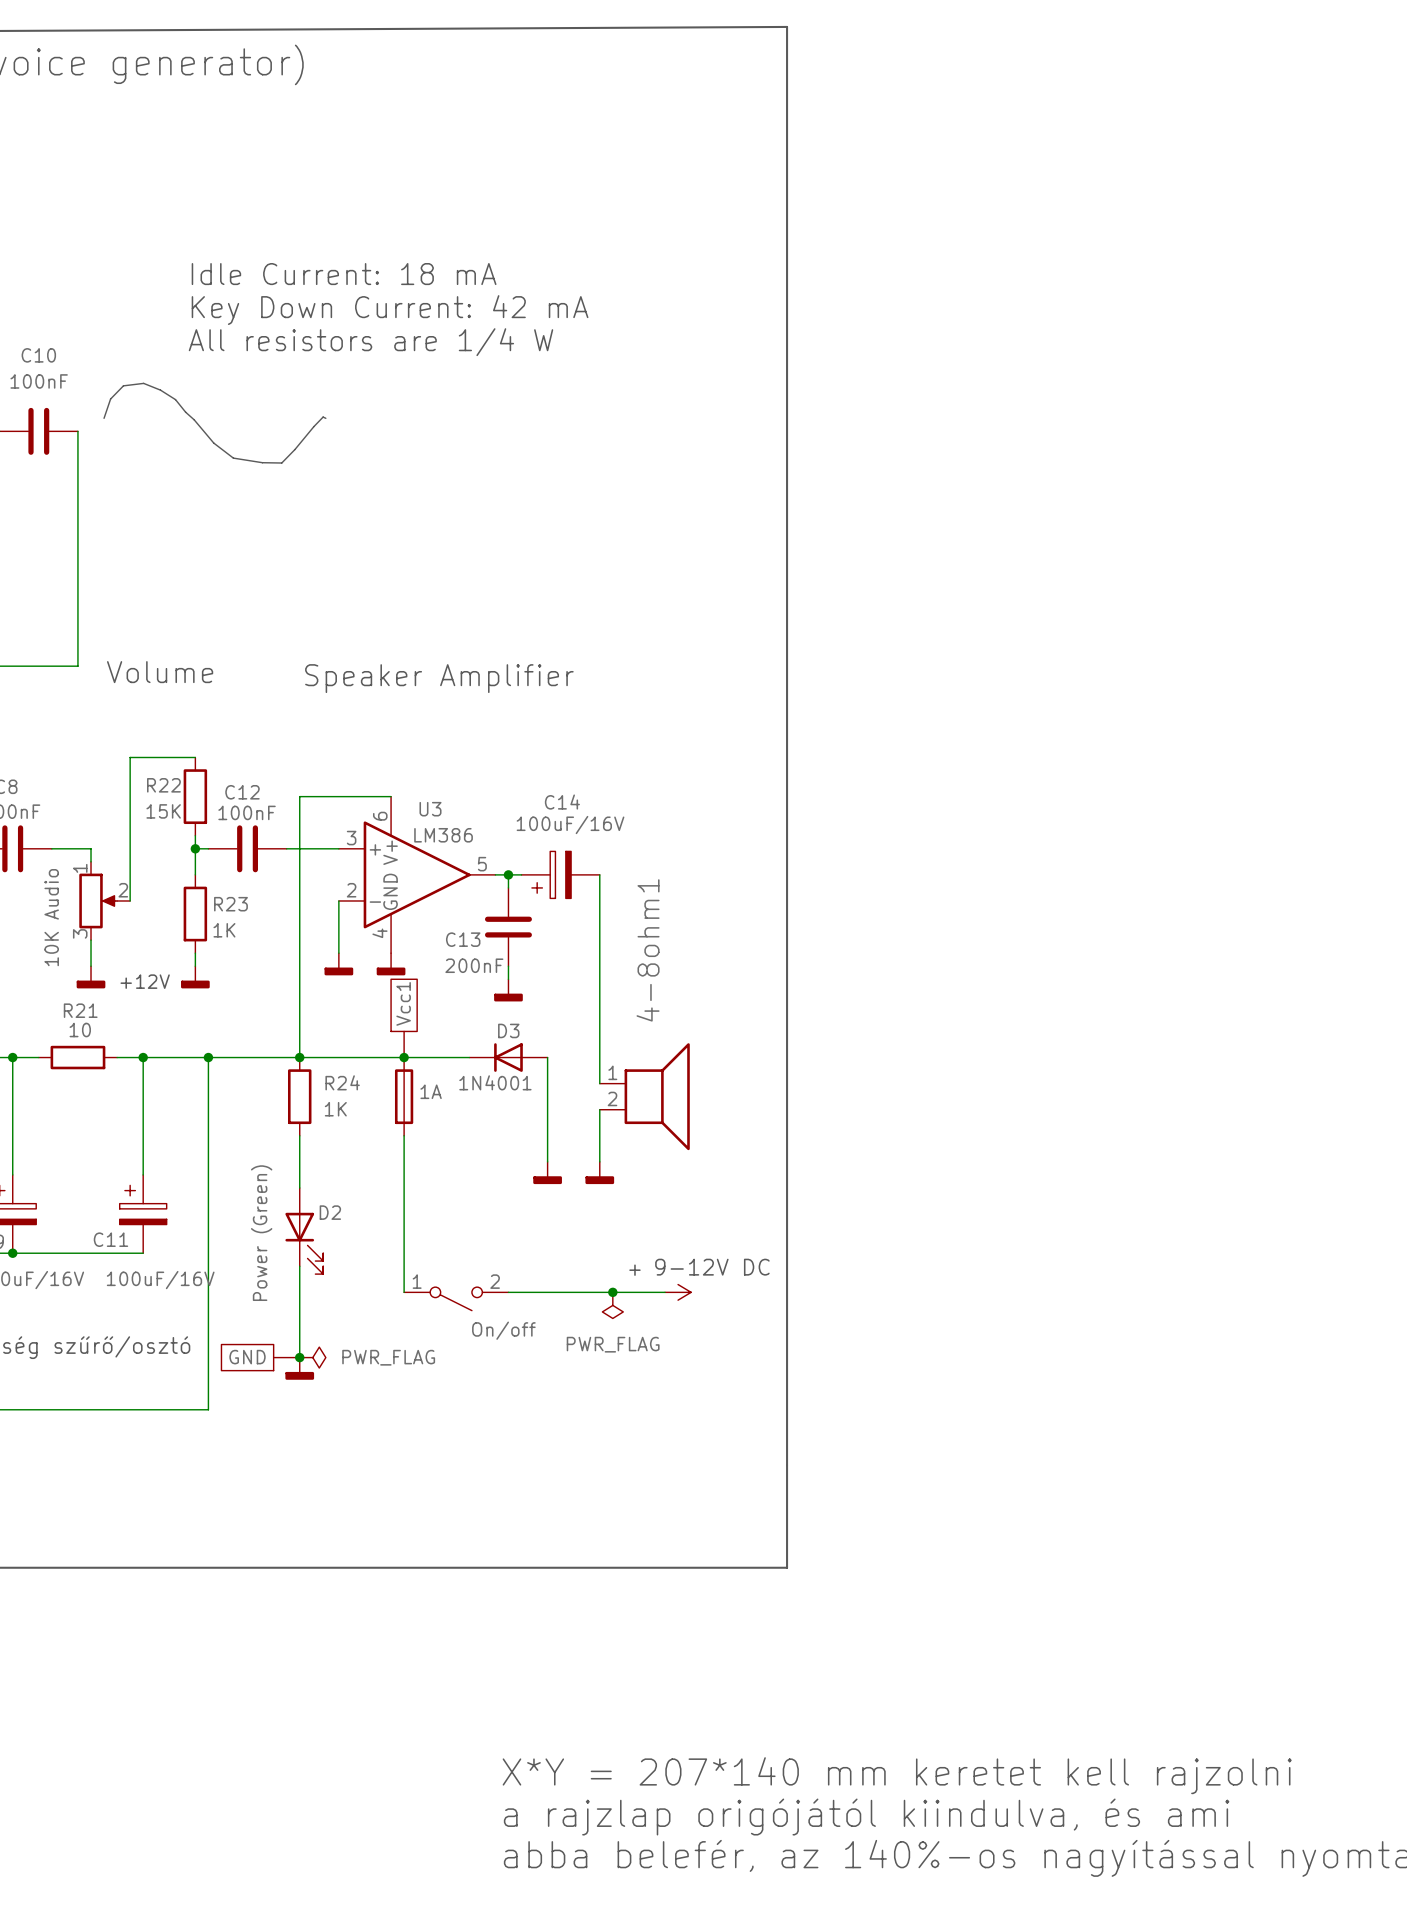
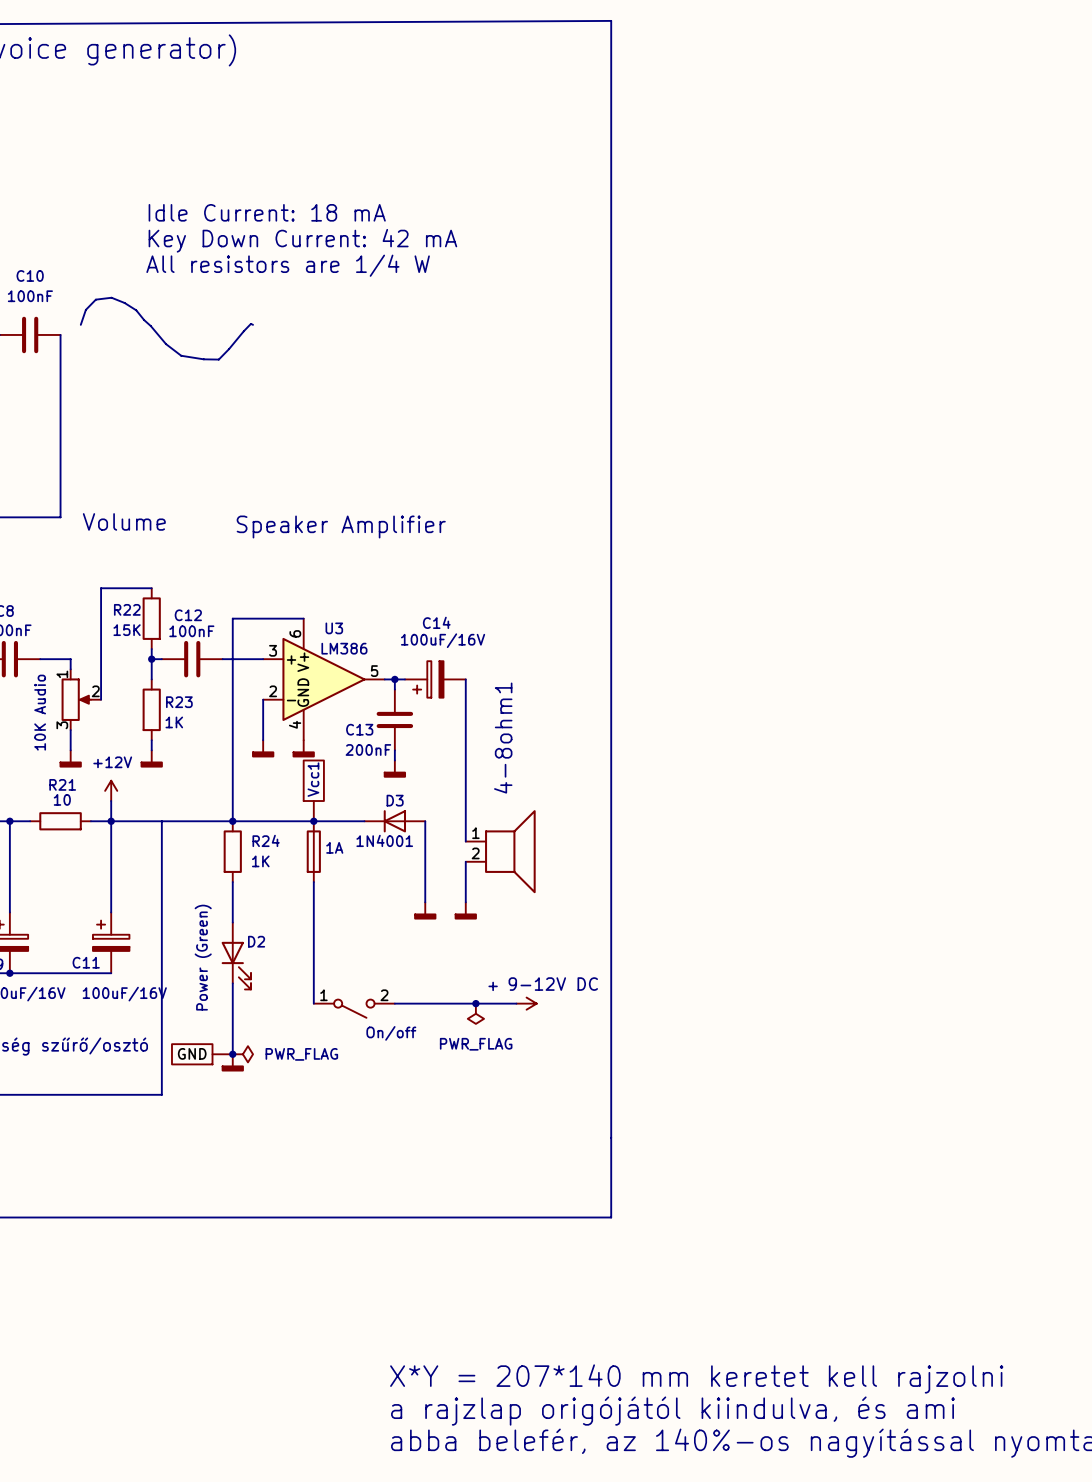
power symbol: none -> (111, 790)
wire: none -> (111, 801) (111, 821)
junction: (208, 1057) -> none

